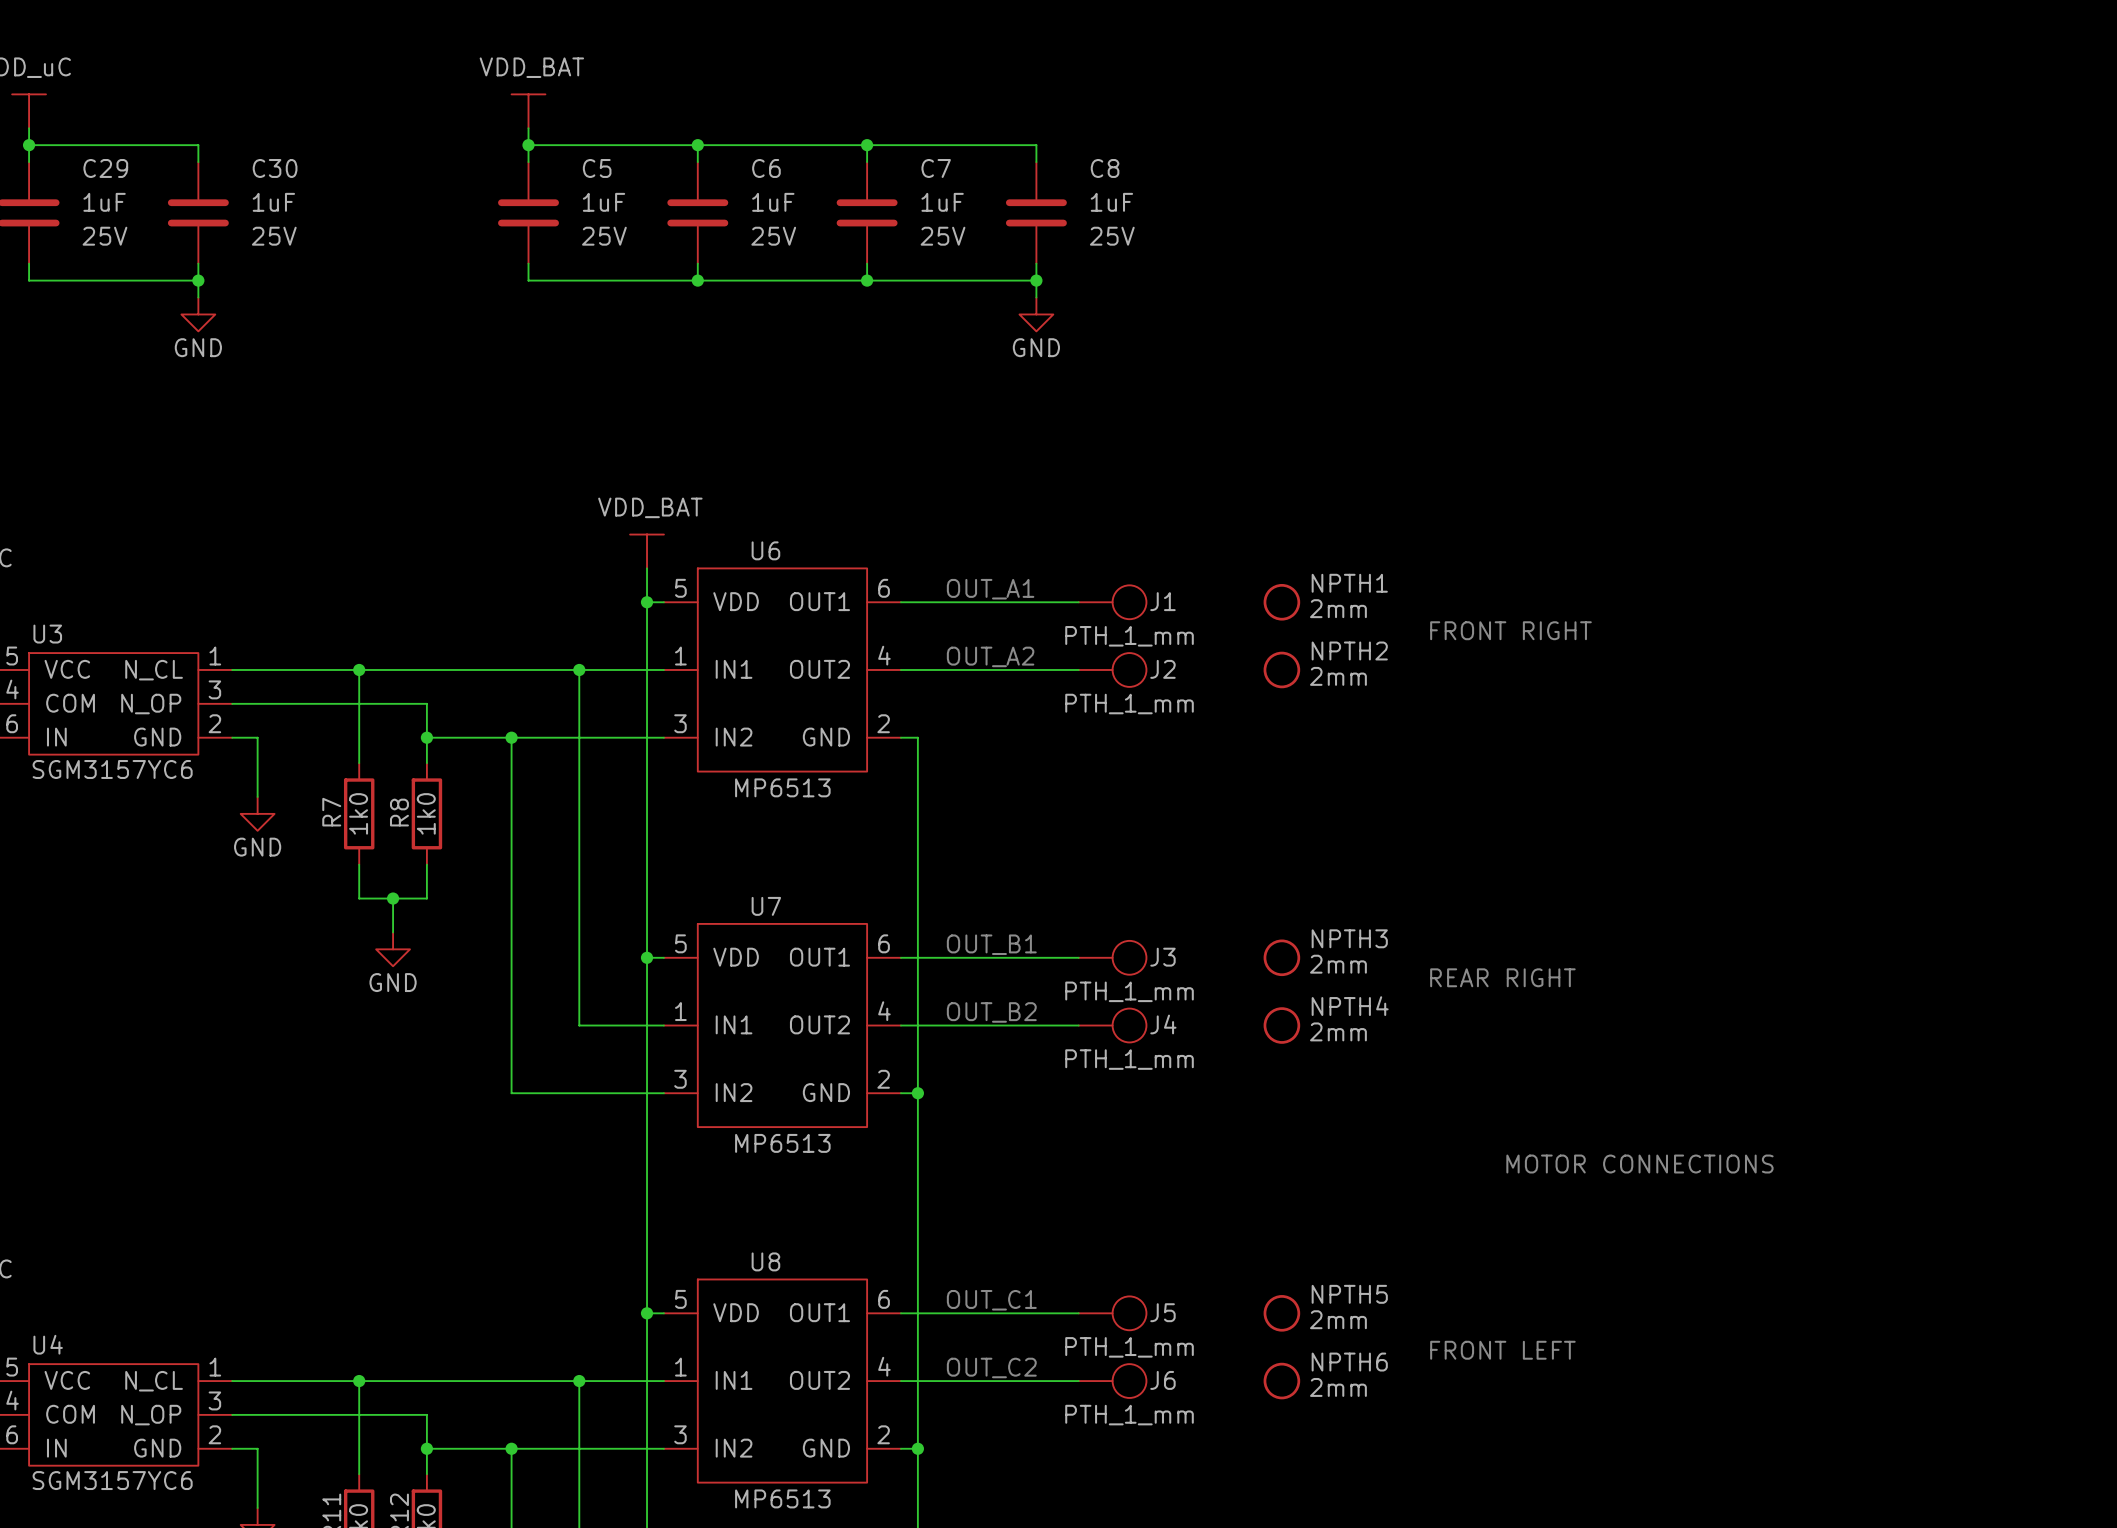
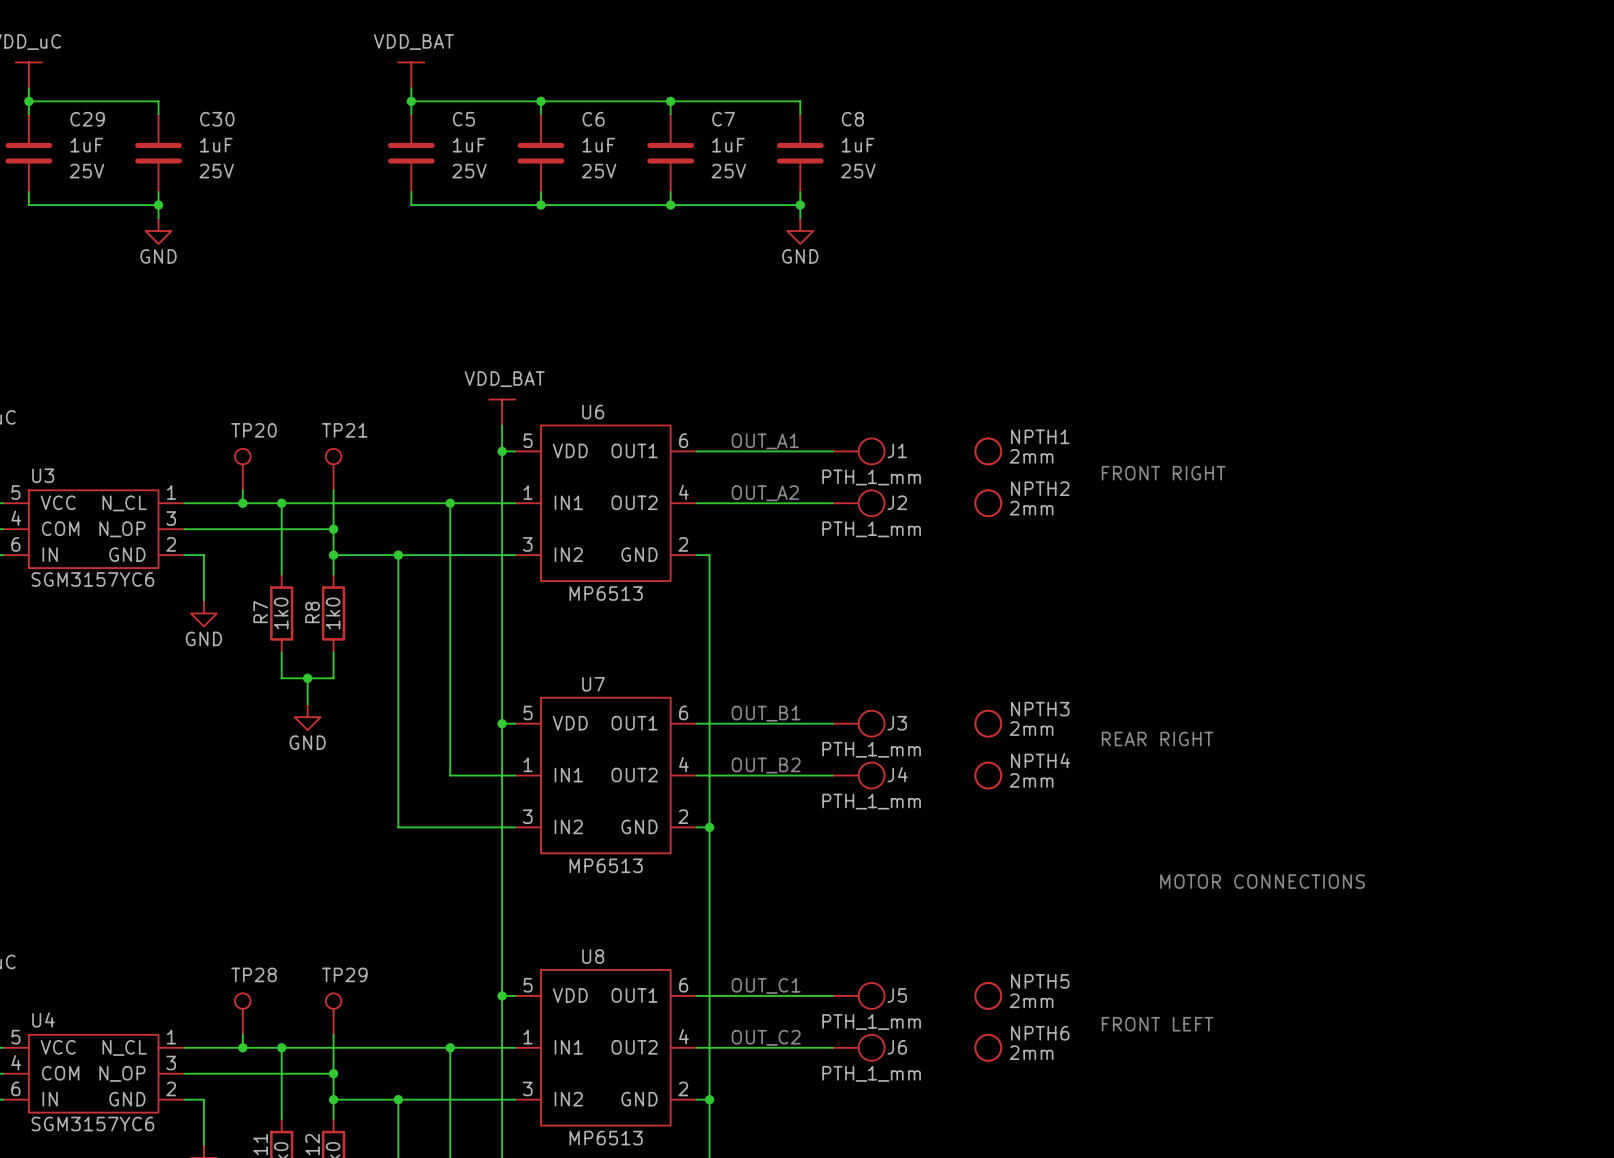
TP20: none -> (242, 469)
TP21: none -> (333, 469)
wire: none -> (242, 490) (242, 503)
wire: none -> (333, 490) (333, 529)
junction: none -> (242, 503)
junction: none -> (333, 529)
TP28: none -> (242, 1014)
TP29: none -> (333, 1014)
wire: none -> (242, 1034) (242, 1047)
wire: none -> (333, 1034) (333, 1073)
junction: none -> (242, 1047)
junction: none -> (333, 1073)

